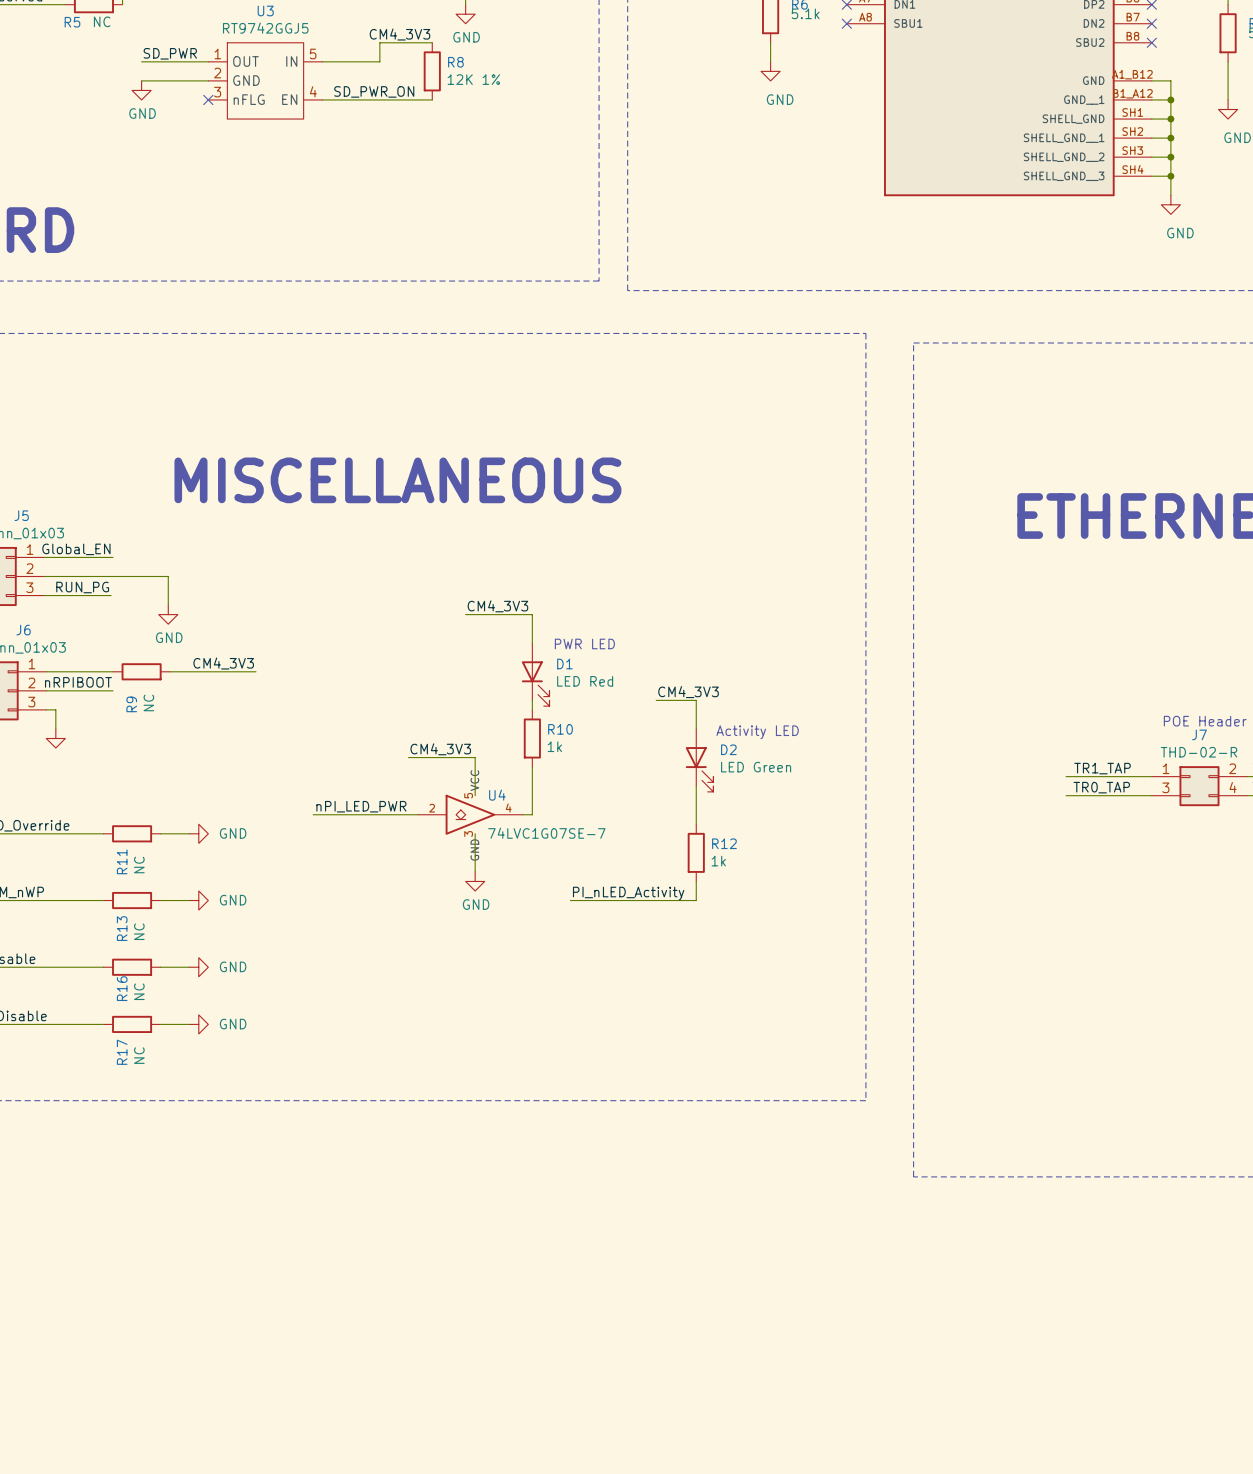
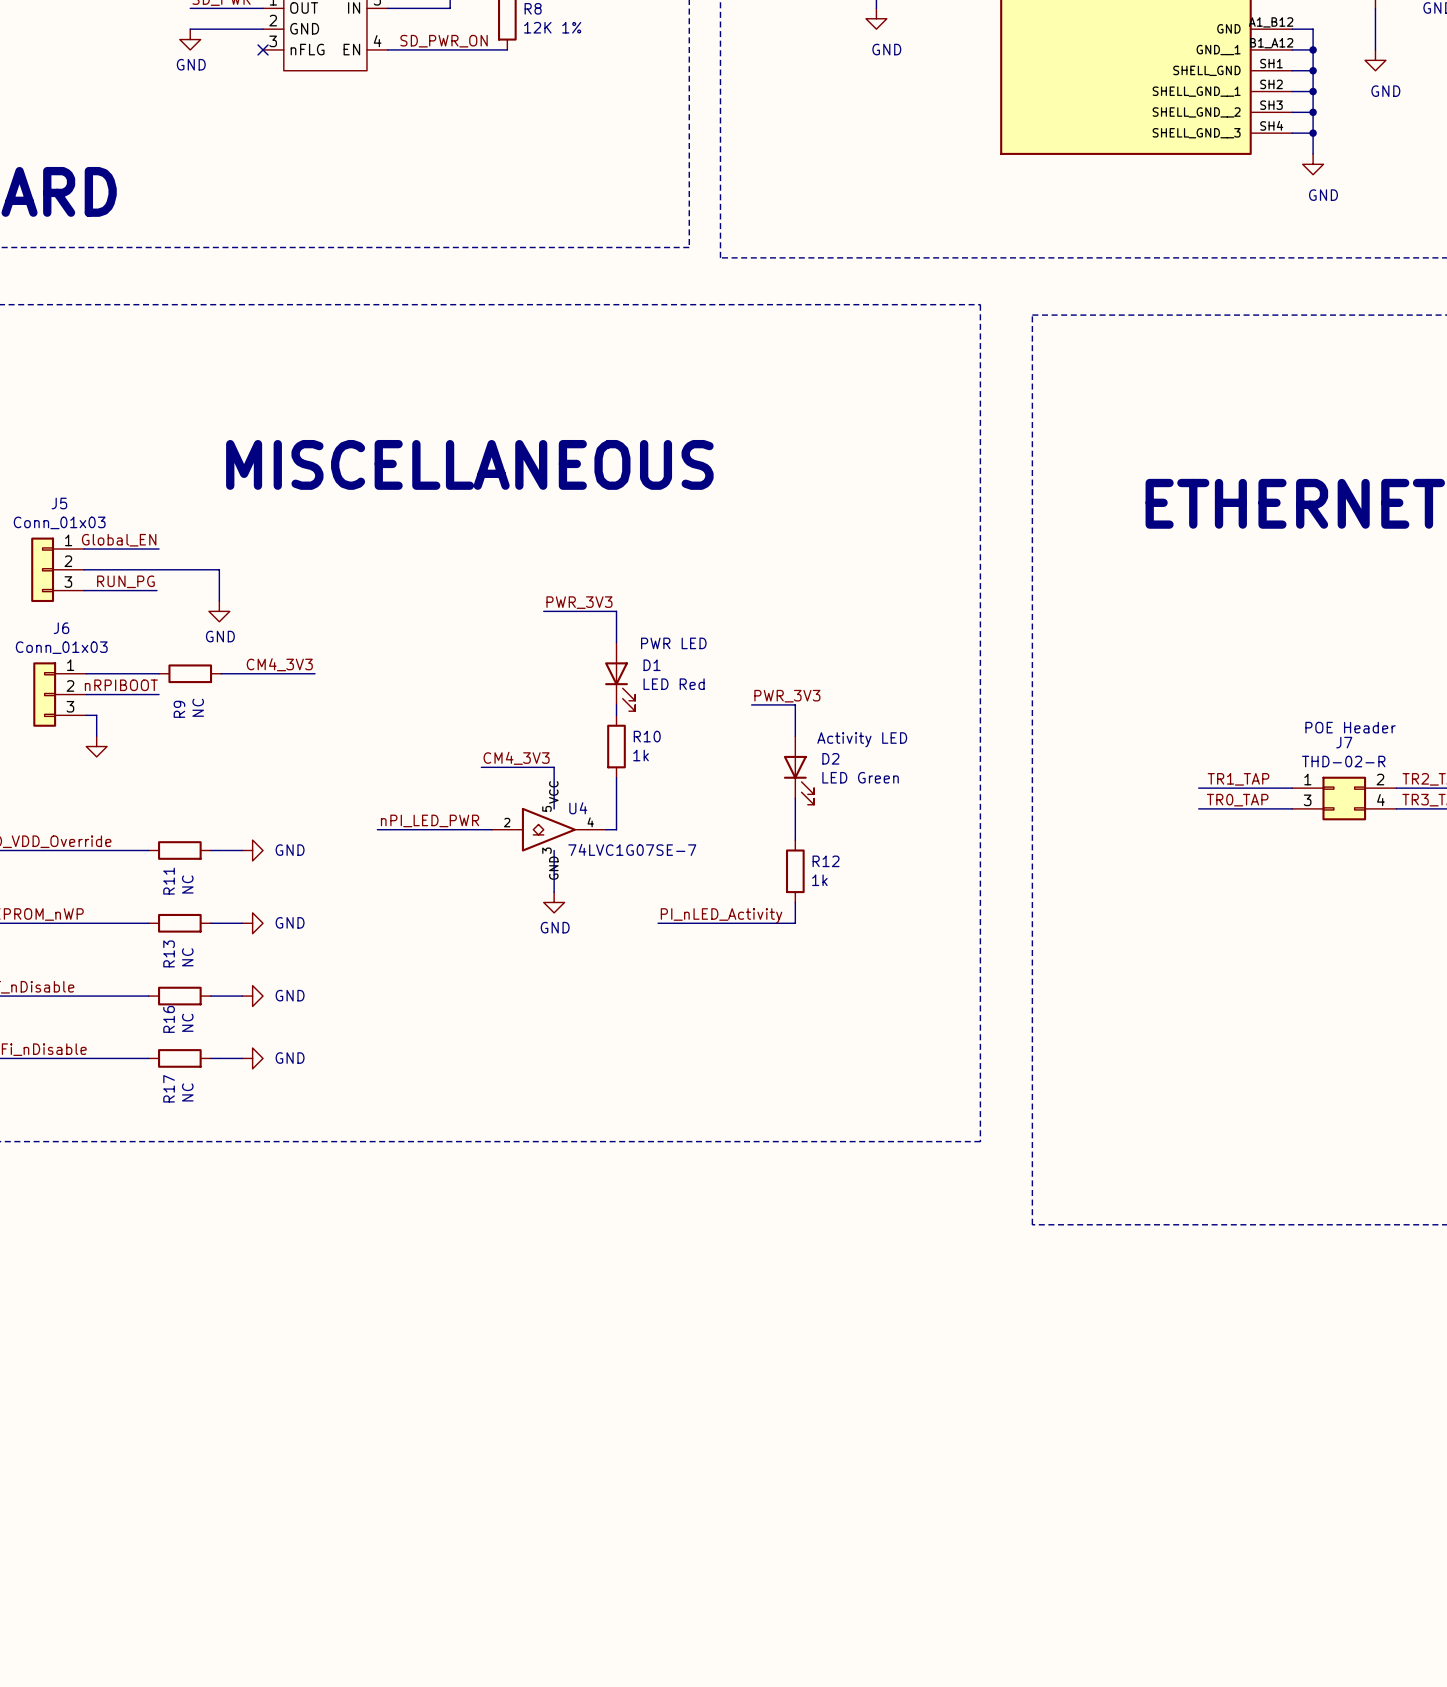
label: CM4_3V3 (497, 606) -> PWR_3V3 (579, 602)
label: CM4_3V3 (688, 692) -> PWR_3V3 (787, 696)

